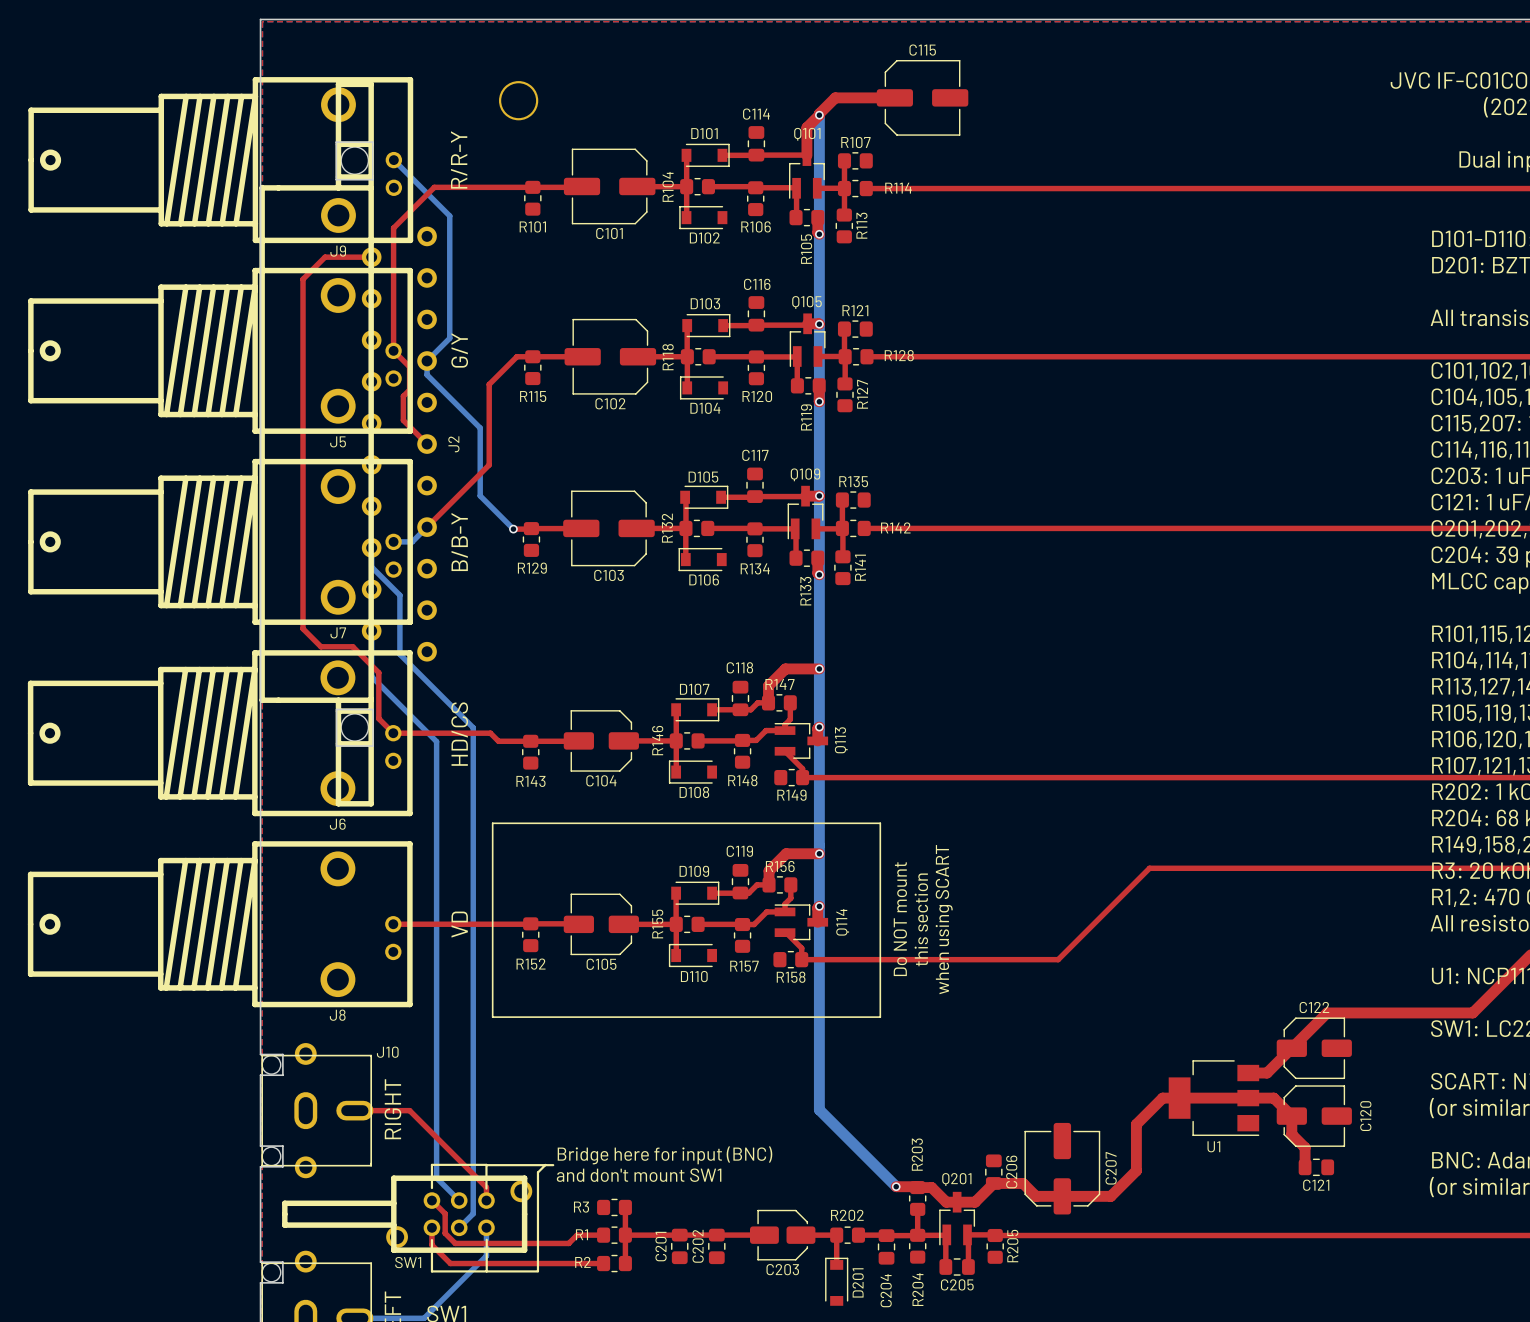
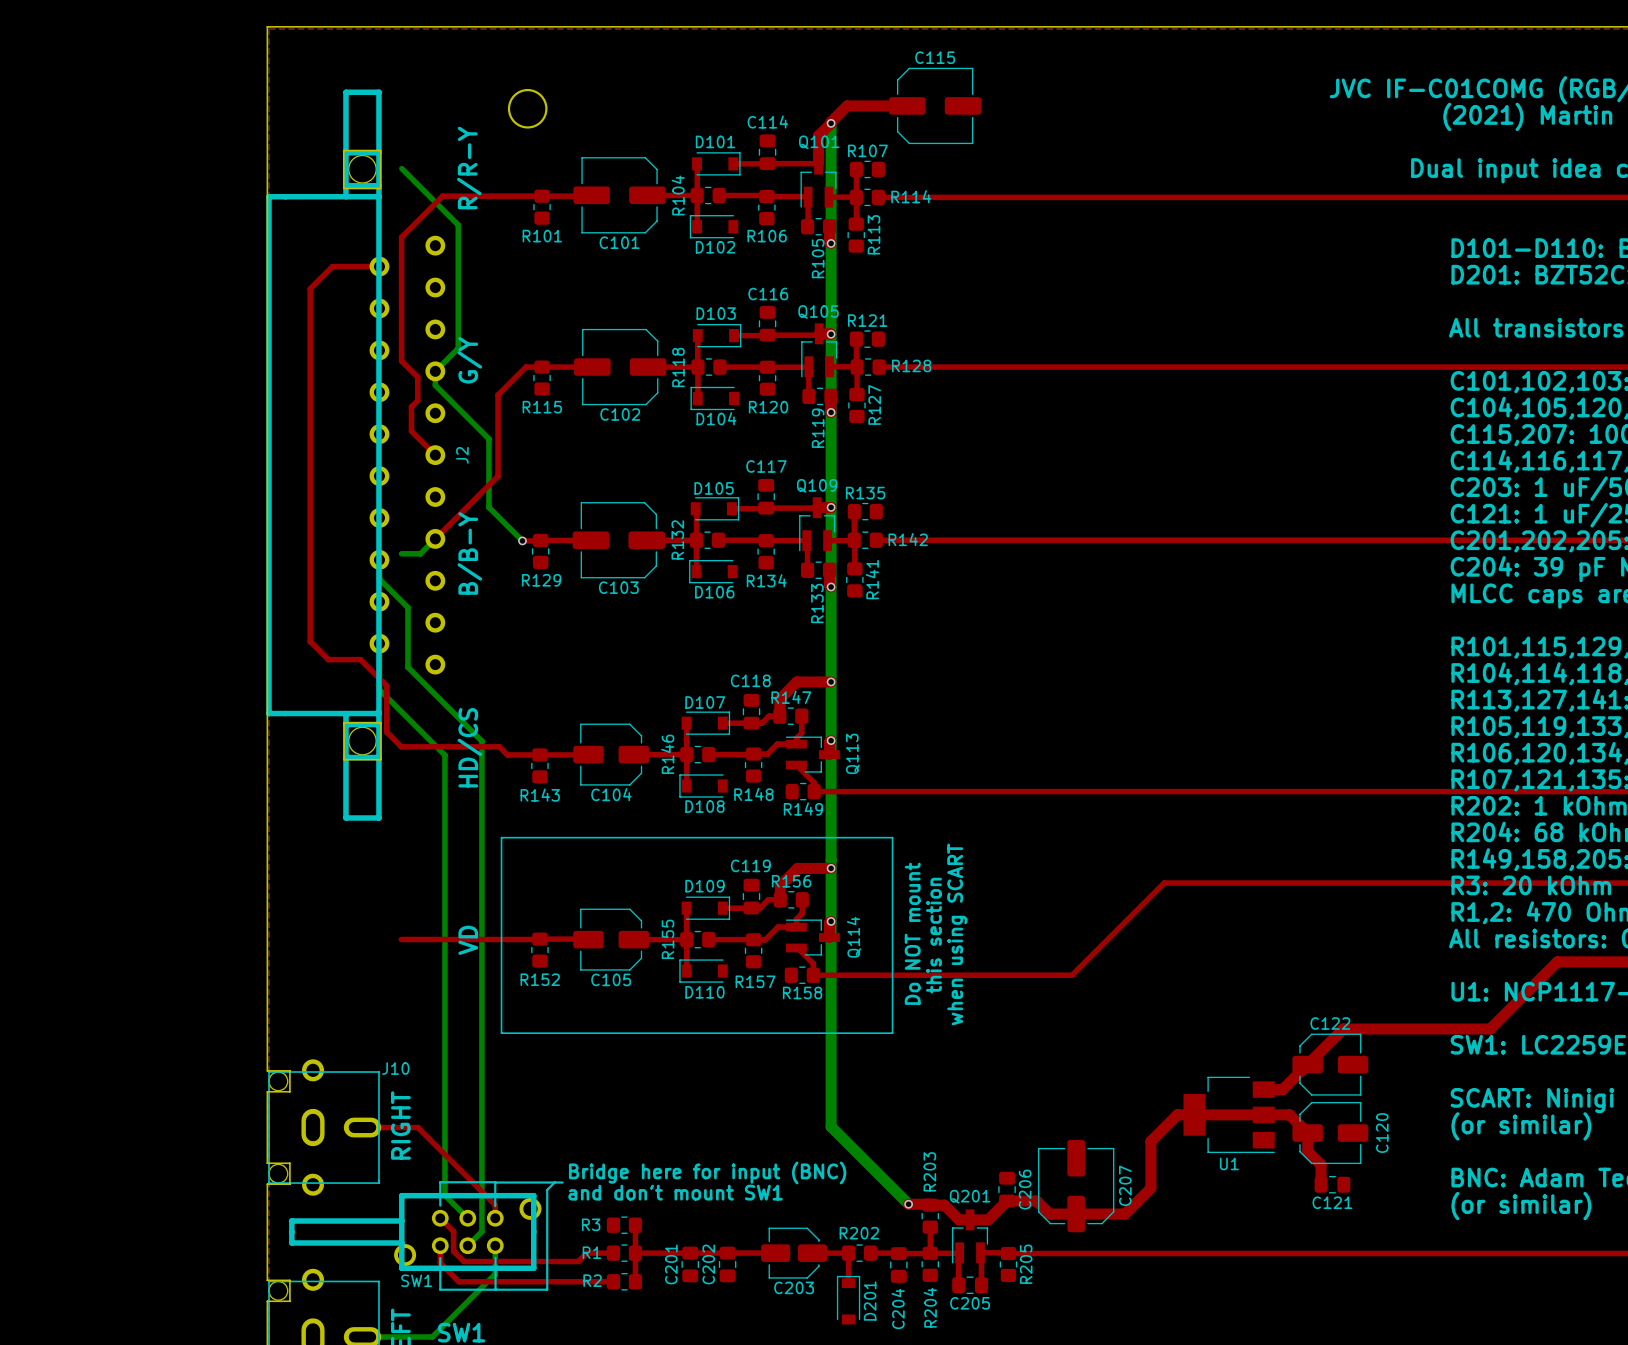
J9: (220, 160) -> none
J5: (220, 350) -> none
J7: (220, 541) -> none
J6: (220, 733) -> none
J8: (220, 924) -> none

